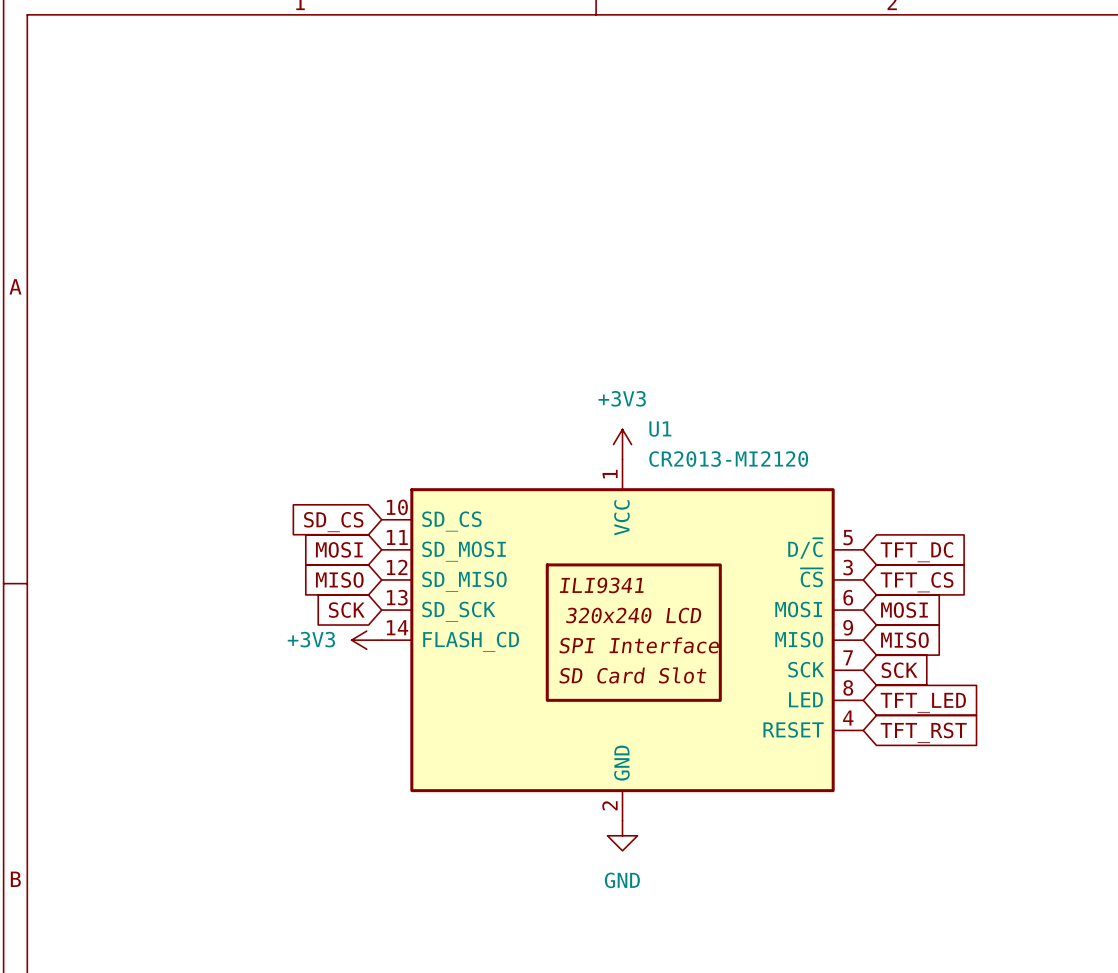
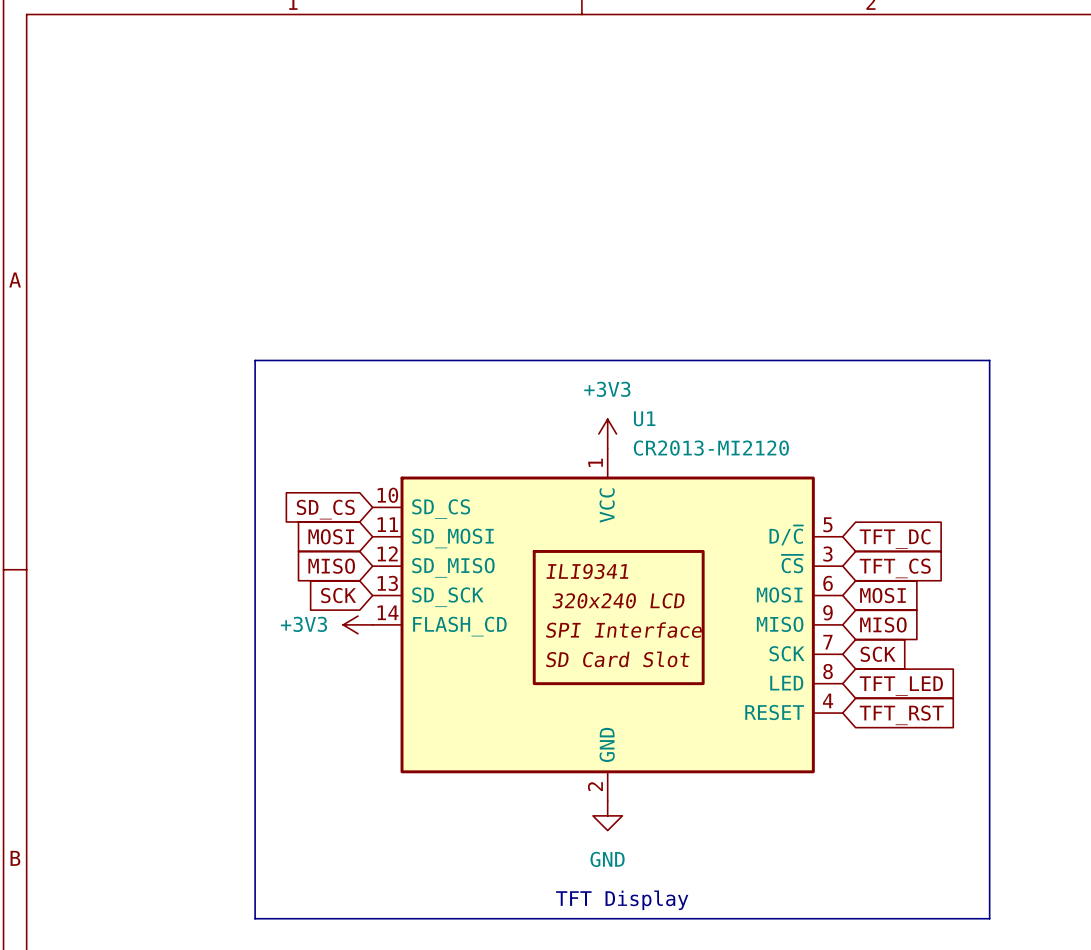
line: none -> (255, 360) (989, 360) (989, 918) (255, 918) (255, 360)
text: none -> TFT Display (622, 900)

